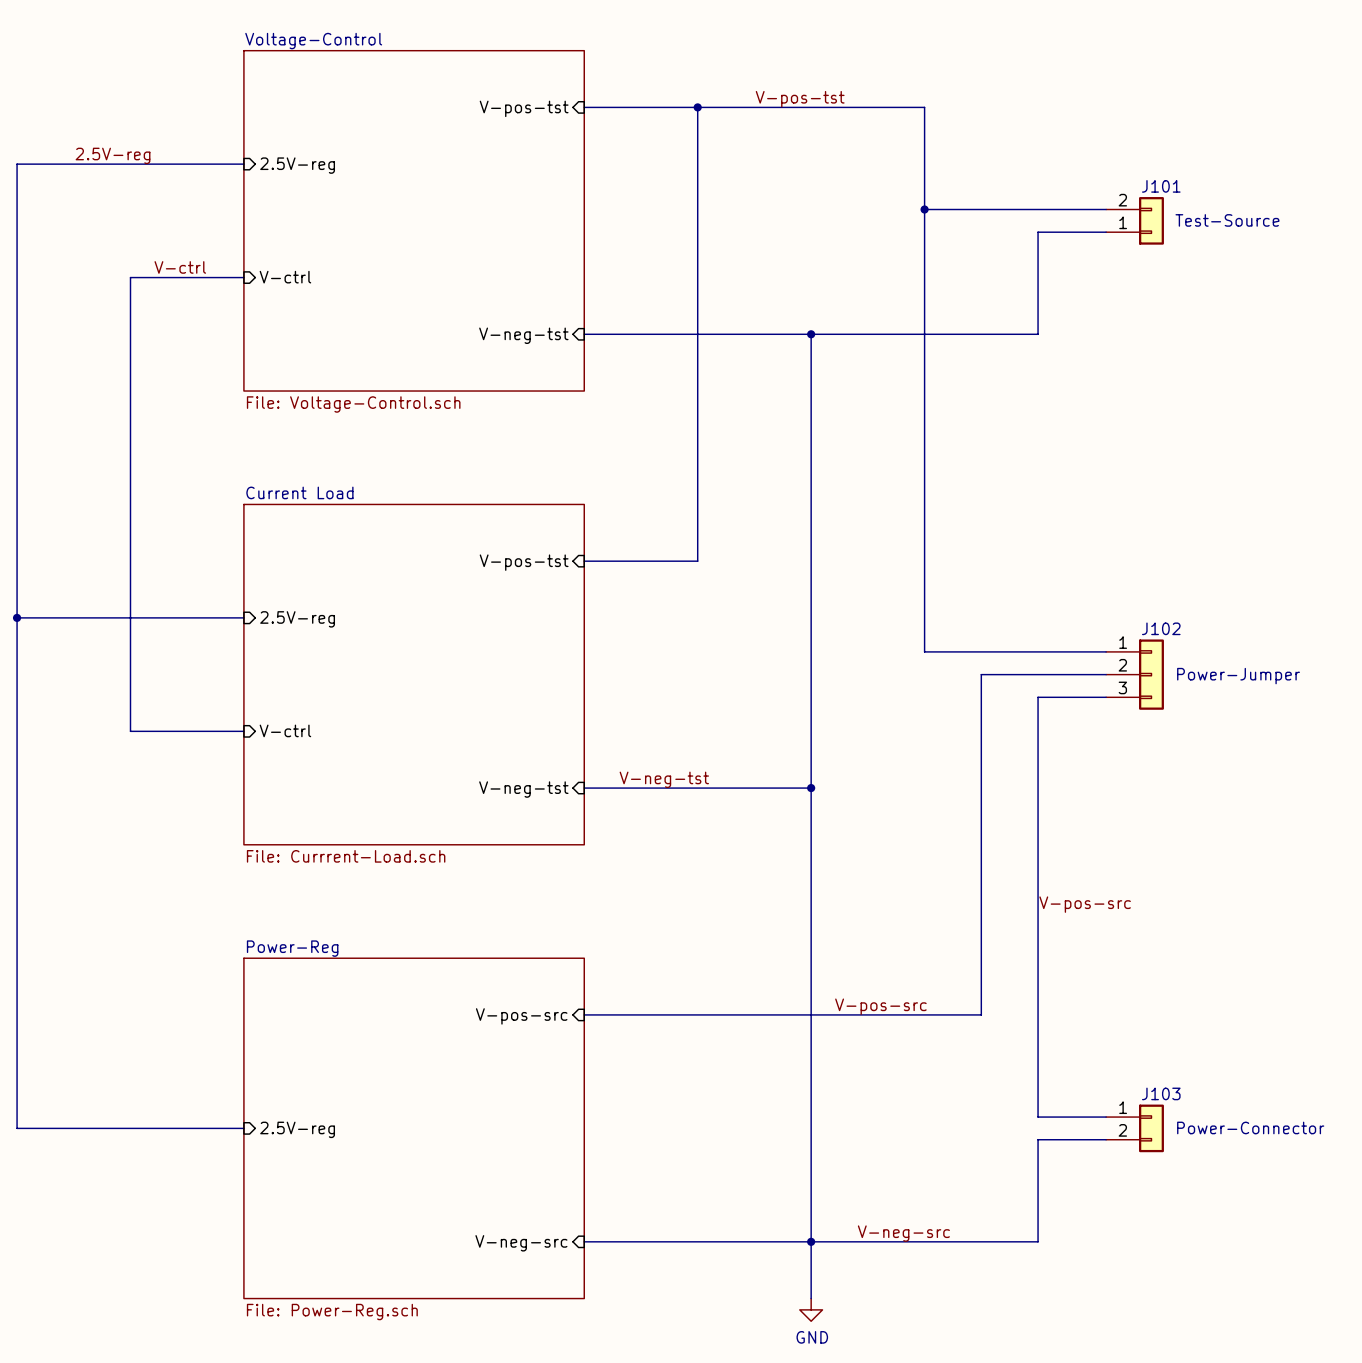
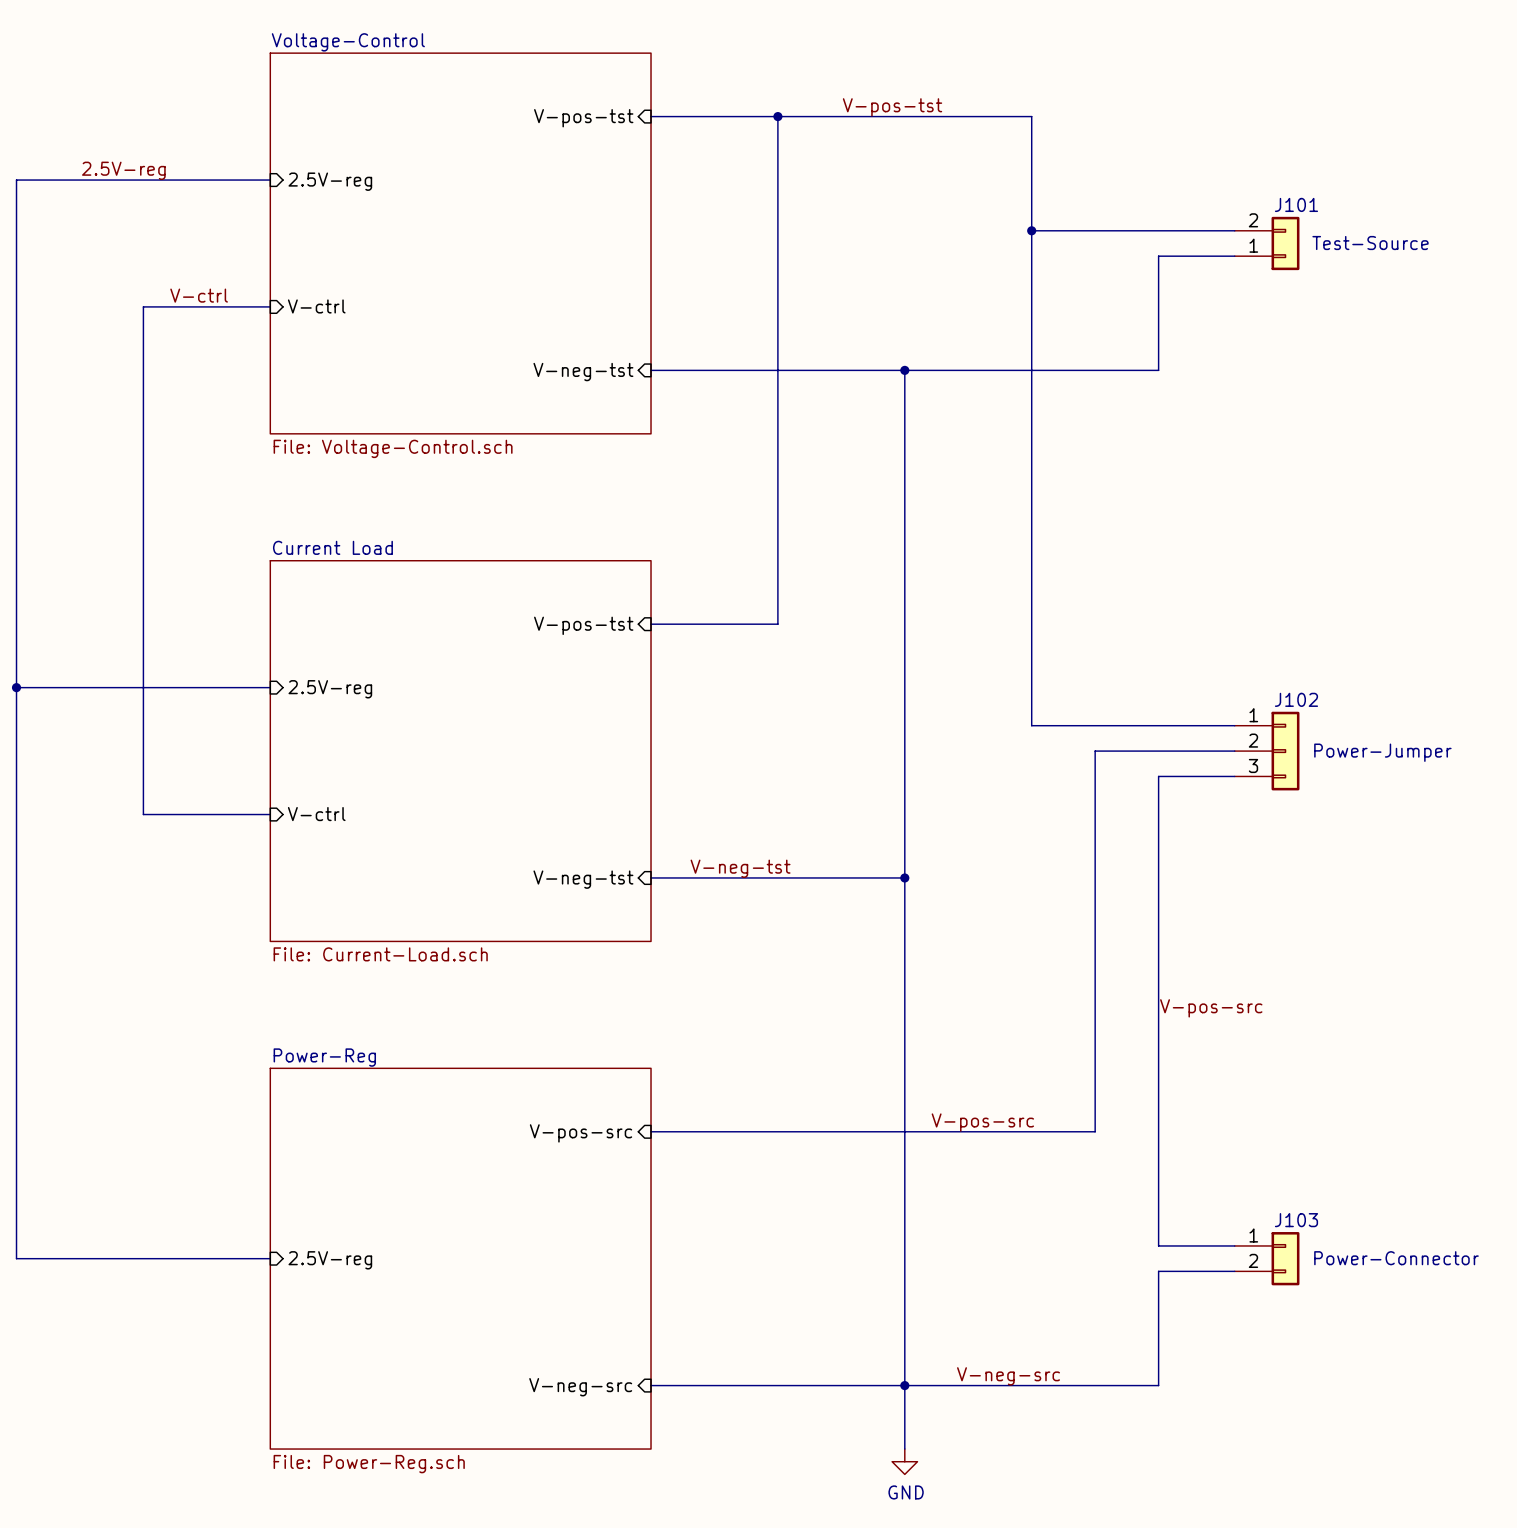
sheet Current Load value: File: Currrent-Load.sch (346, 856) -> File: Current-Load.sch (380, 954)

